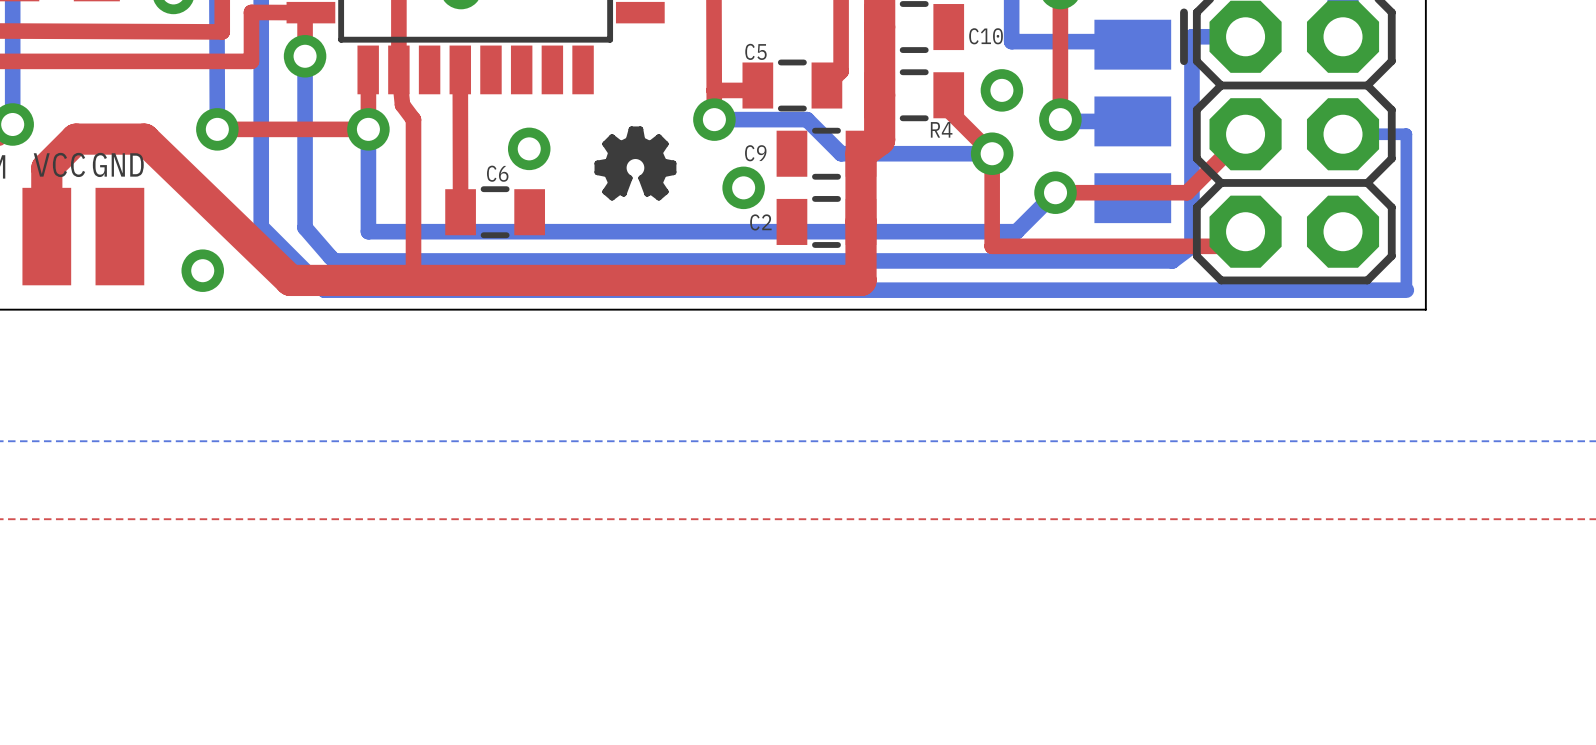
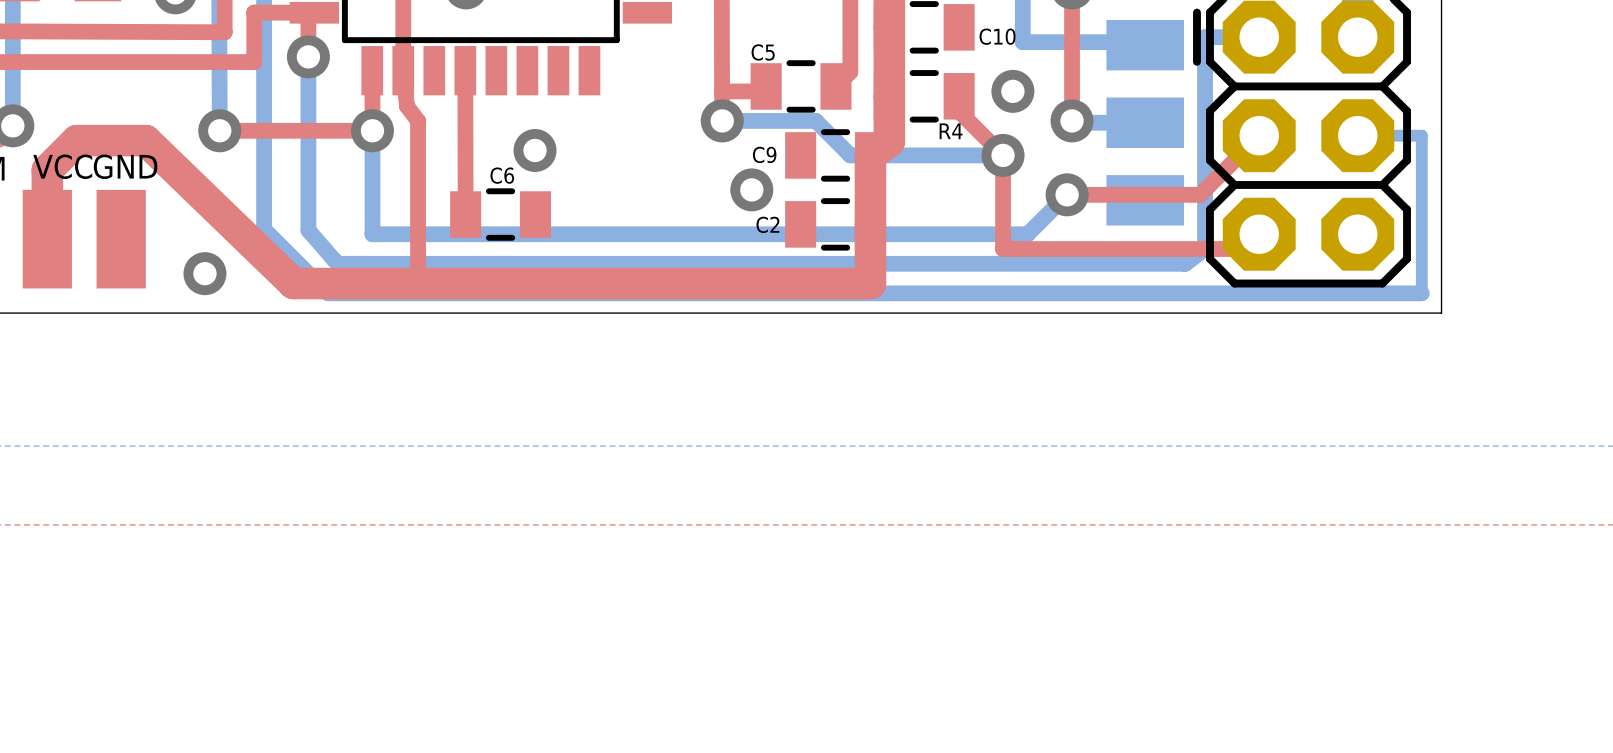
drawing: [594, 126, 677, 201] -> none

